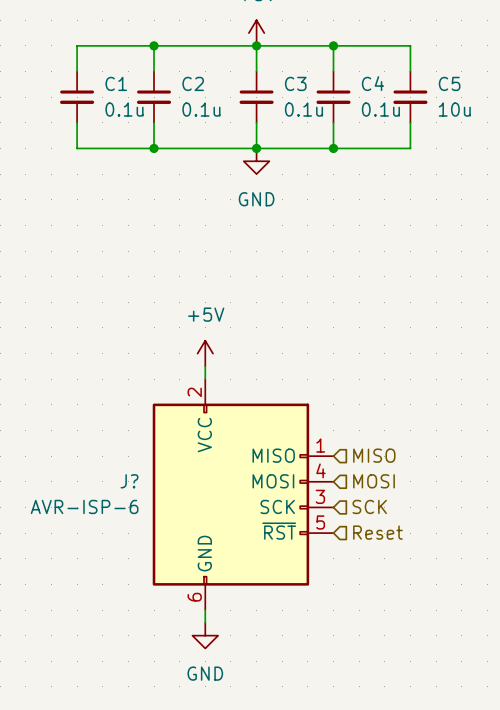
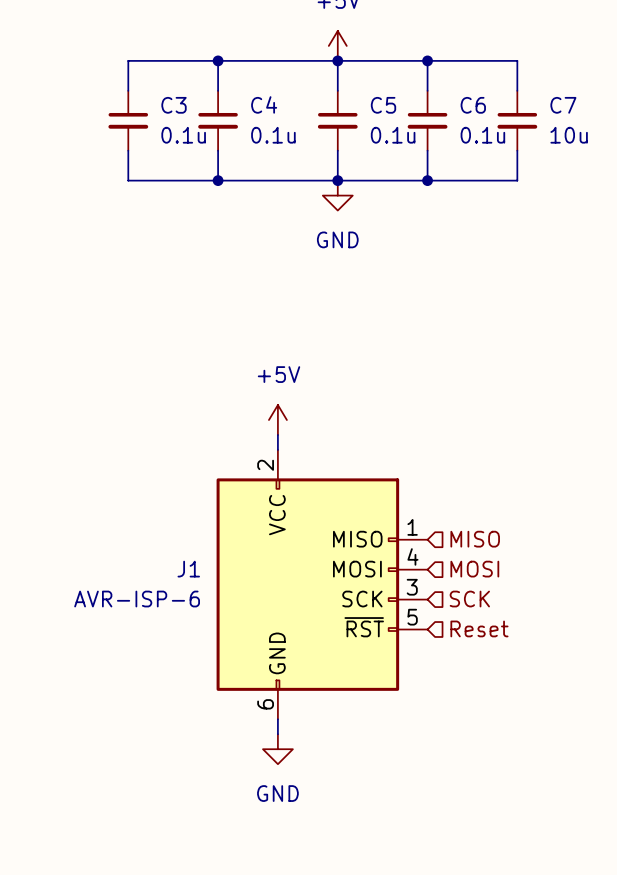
C1 name: C1 (116, 83) -> C3 (174, 105)
C2 name: C2 (193, 83) -> C4 (264, 104)
C3 name: C3 (295, 83) -> C5 (383, 105)
C4 name: C4 (372, 83) -> C6 (473, 105)
C5 name: C5 (449, 83) -> C7 (563, 105)
J? name: J? (129, 481) -> J1 (188, 569)

